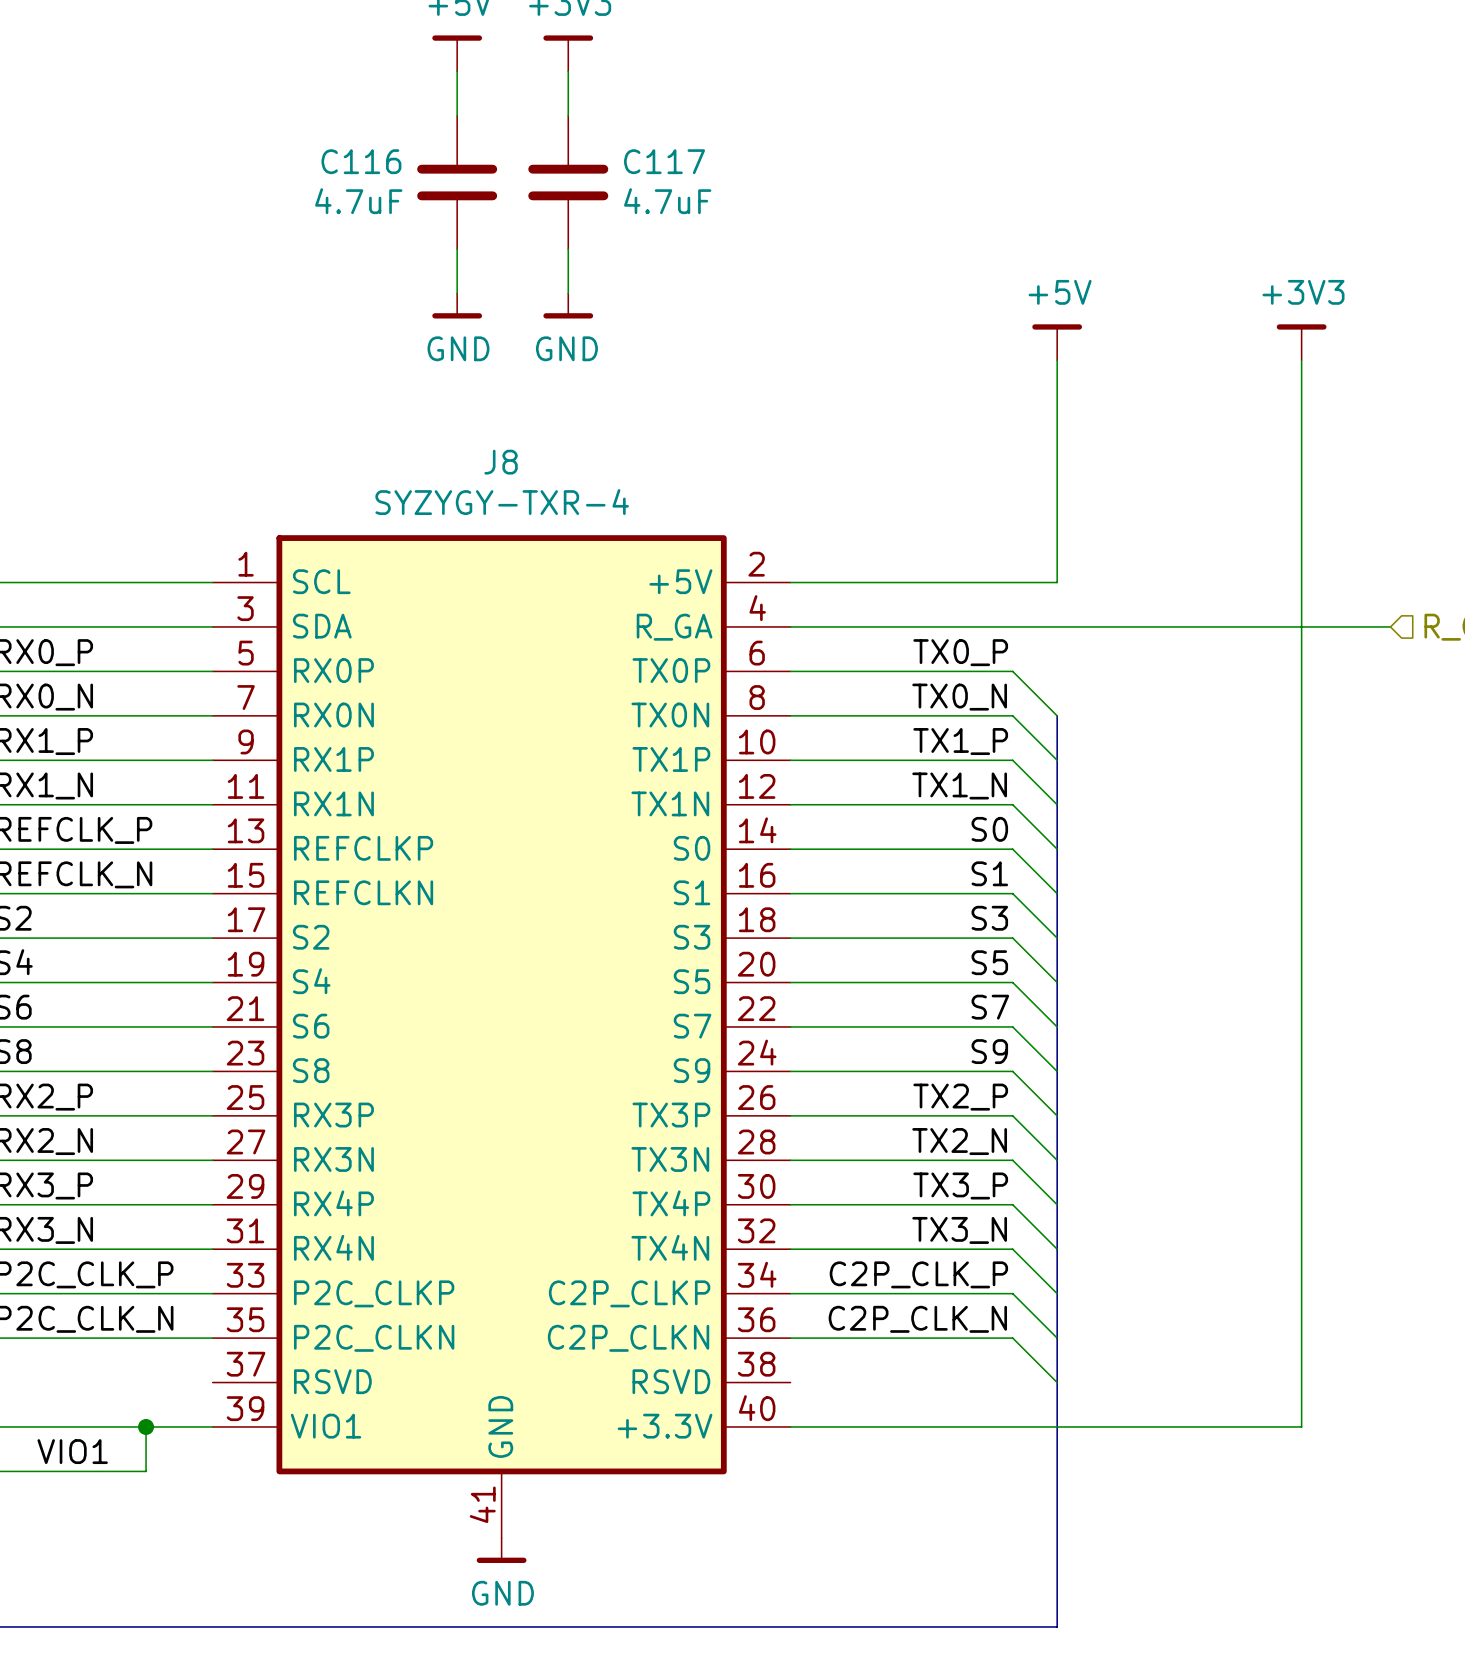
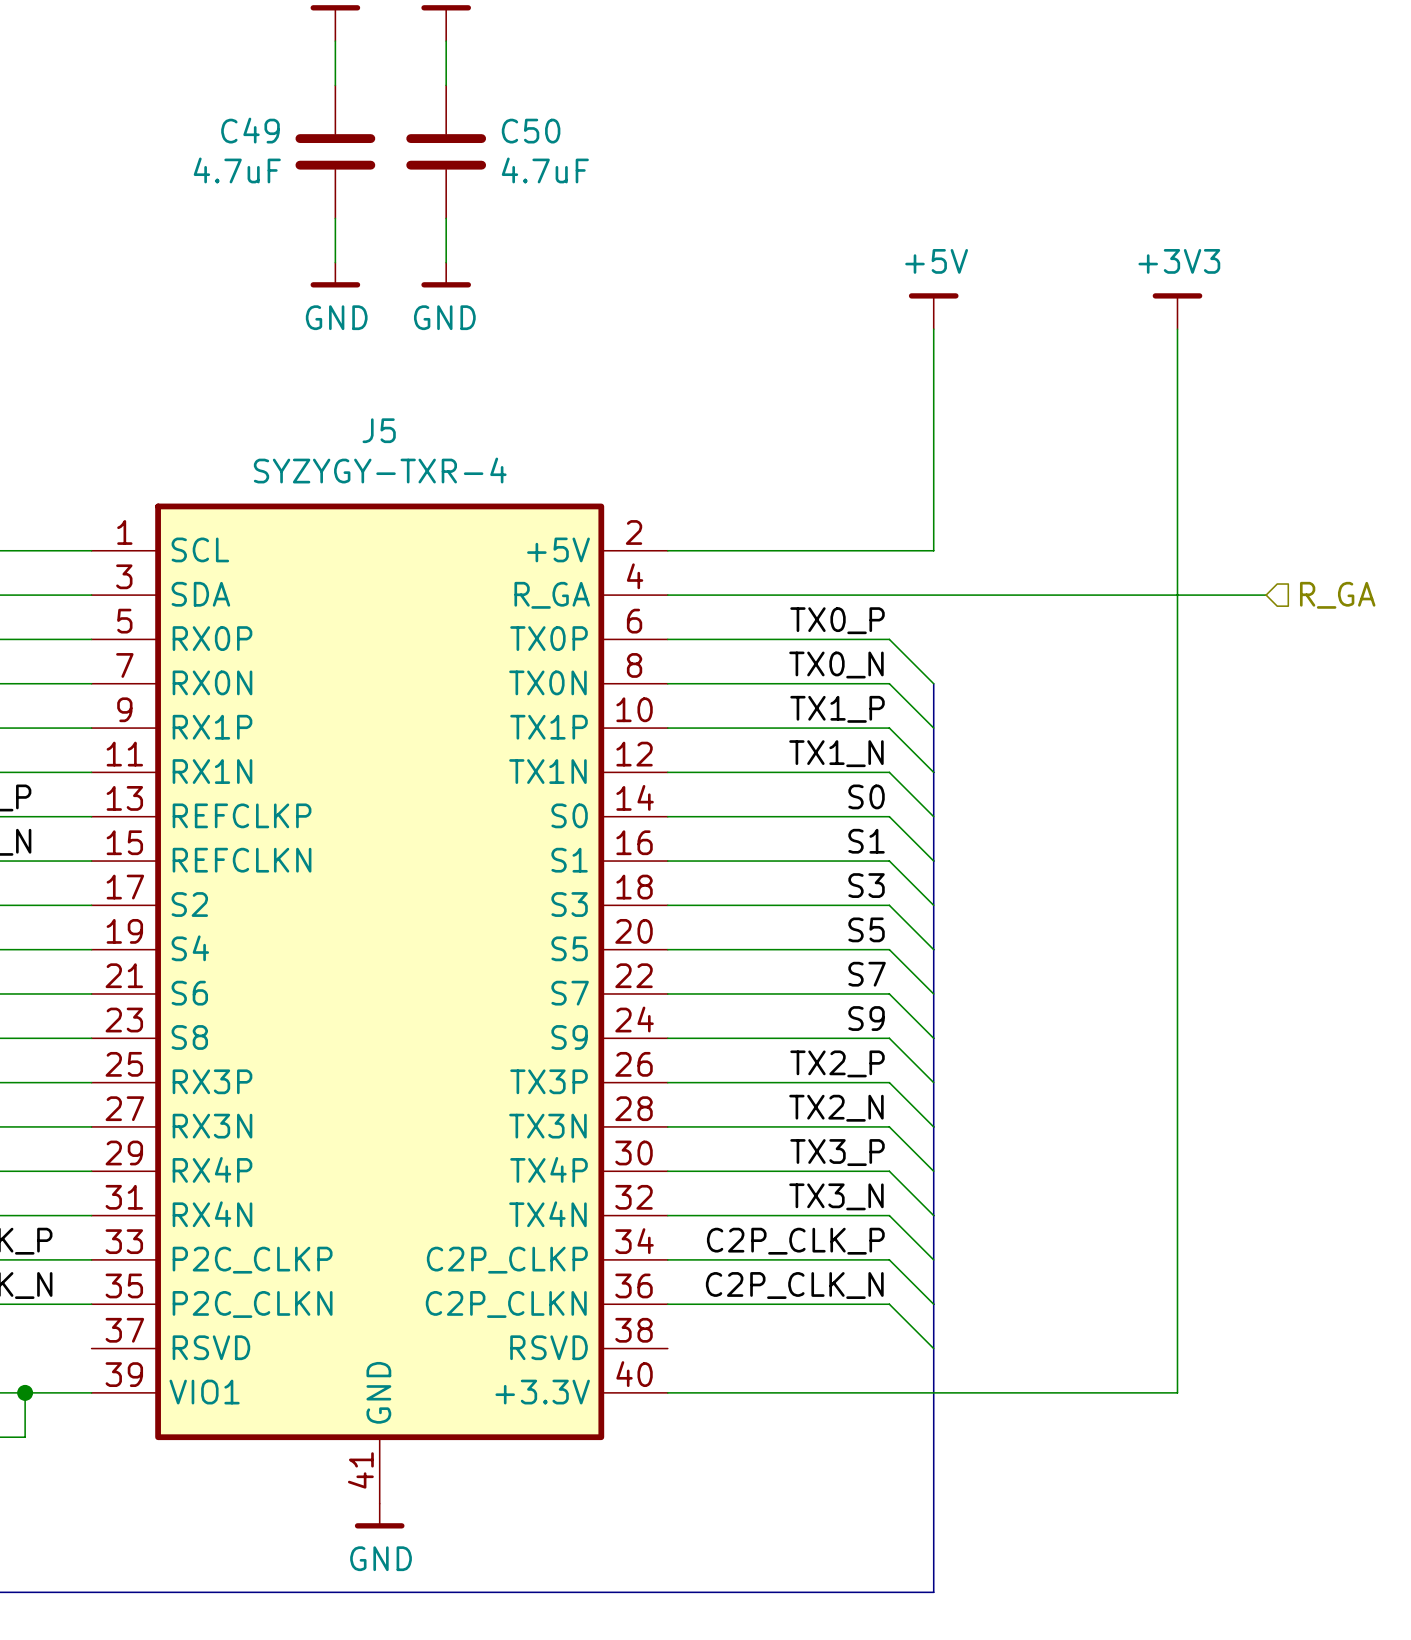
C116 name: C116 (361, 161) -> C49 (250, 130)
C117 name: C117 (664, 161) -> C50 (531, 131)
J8 name: J8 (501, 462) -> J5 (379, 430)

